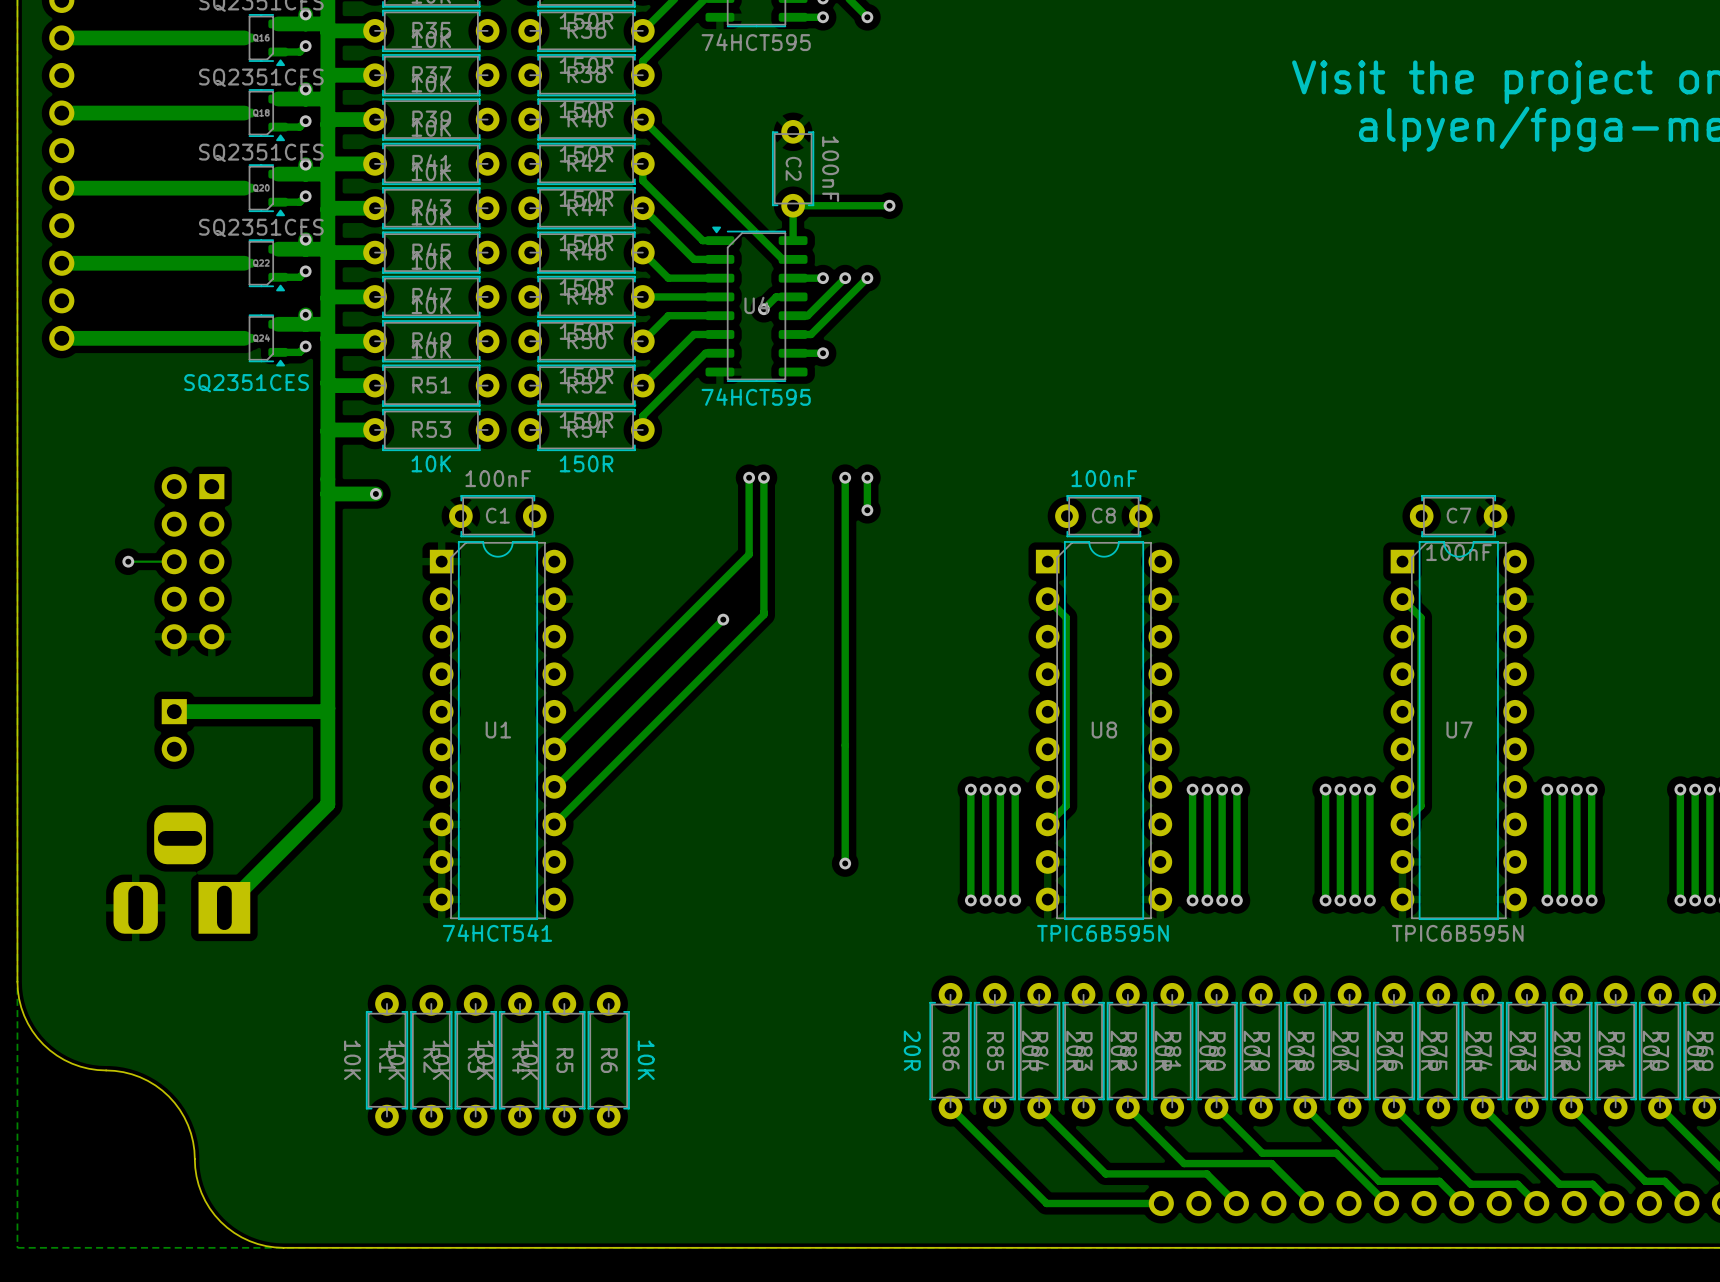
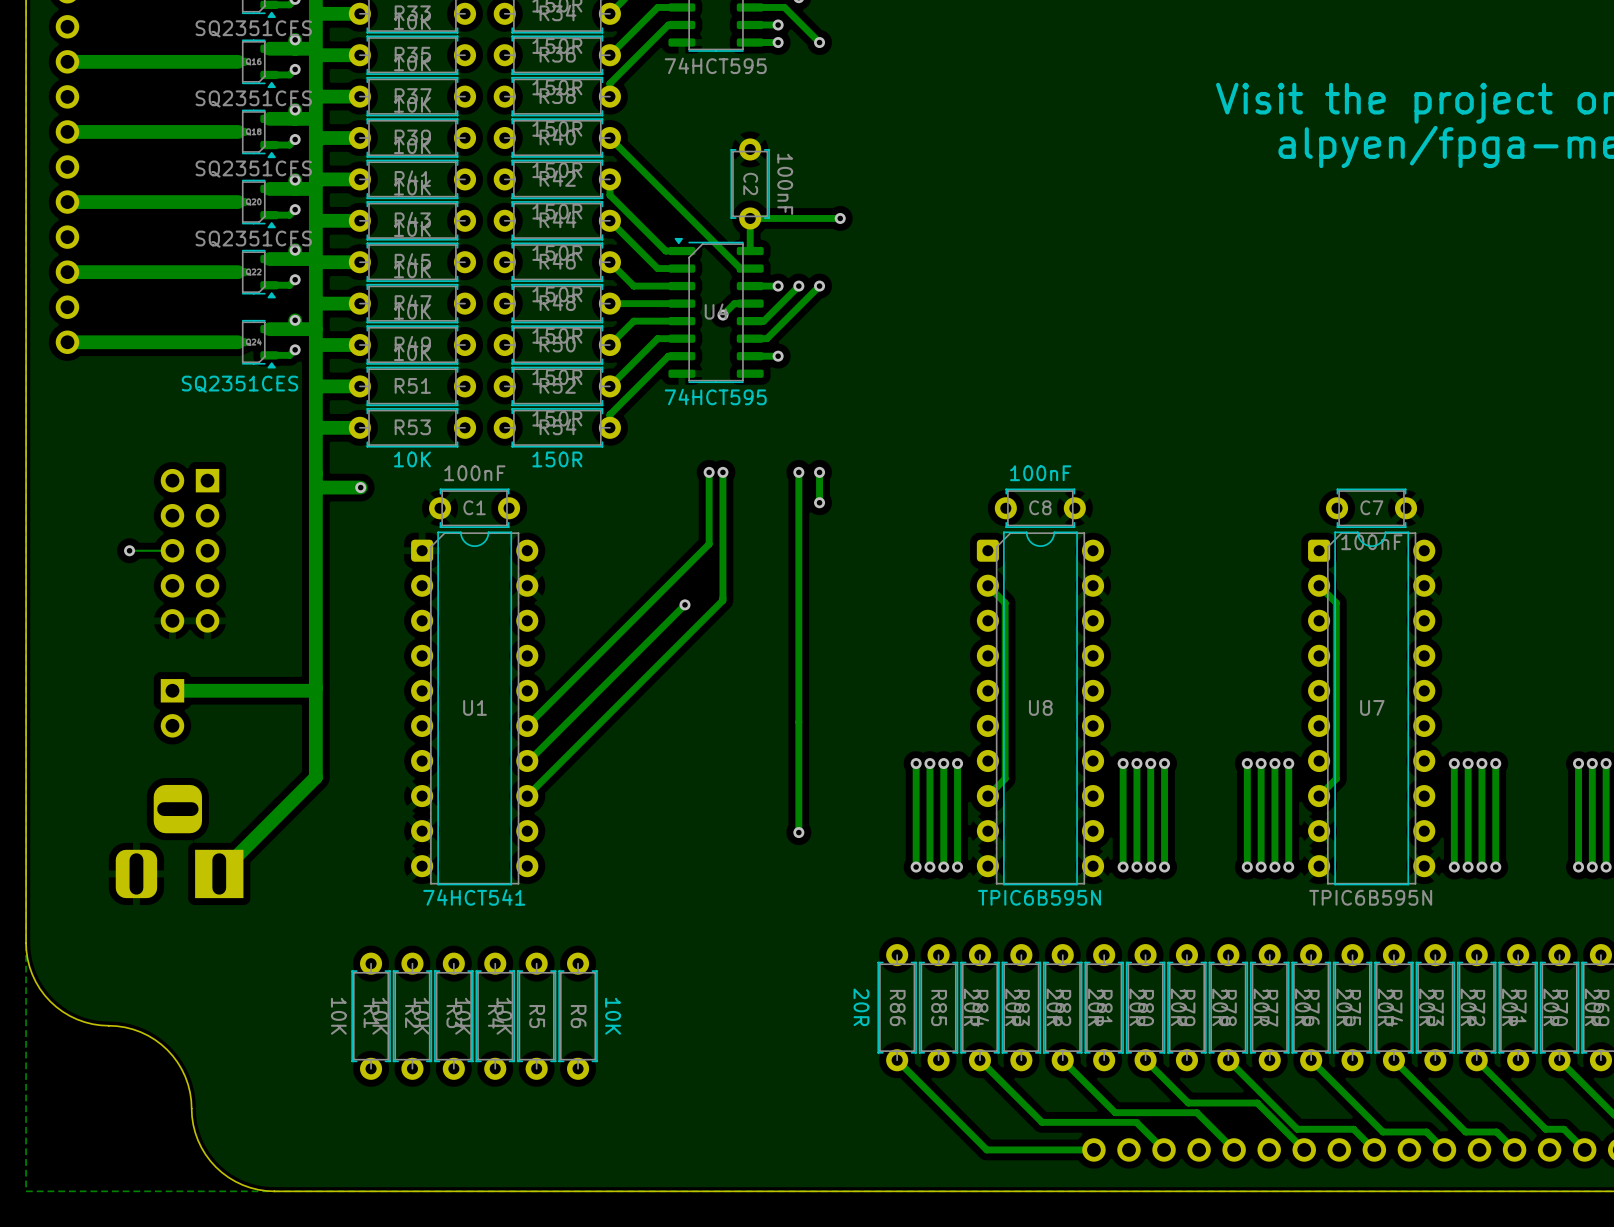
U1 footprint: [429, 541, 567, 921] -> [411, 531, 539, 886]
U8 footprint: [1035, 541, 1173, 921] -> [976, 531, 1105, 886]
U7 footprint: [1390, 541, 1527, 921] -> [1308, 531, 1436, 886]

